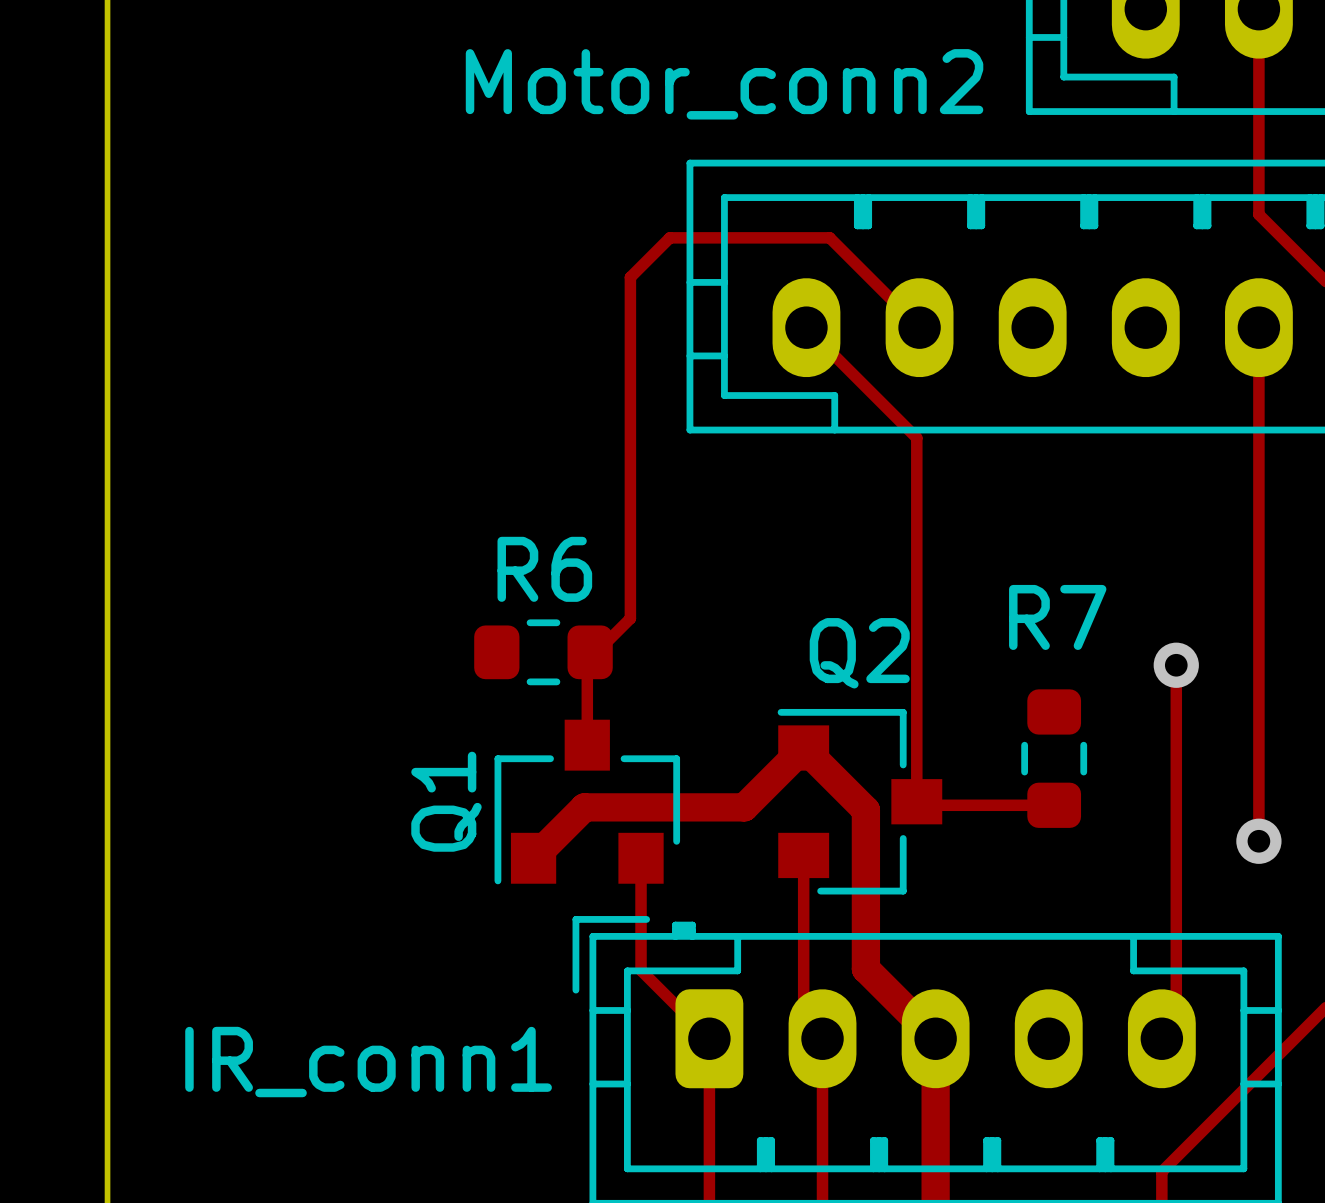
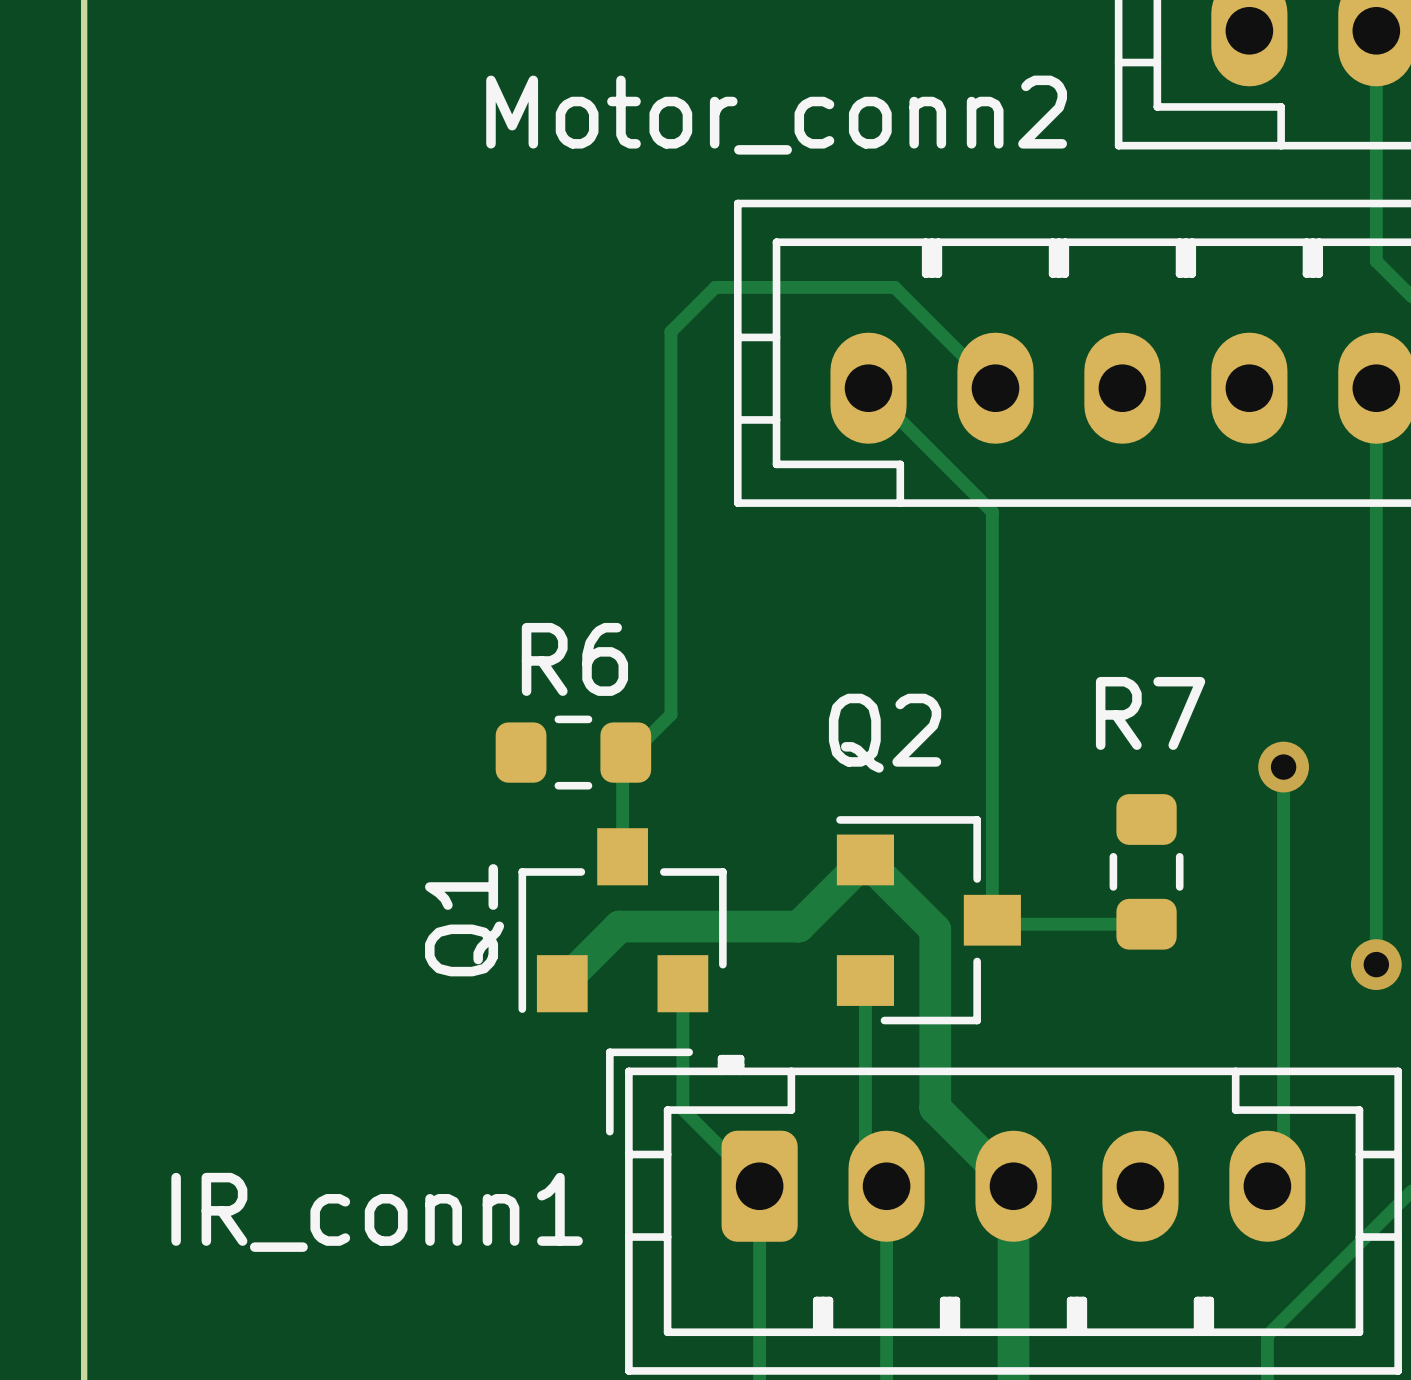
Q2 name position: Q2 (859, 653) -> Q2 (885, 733)

